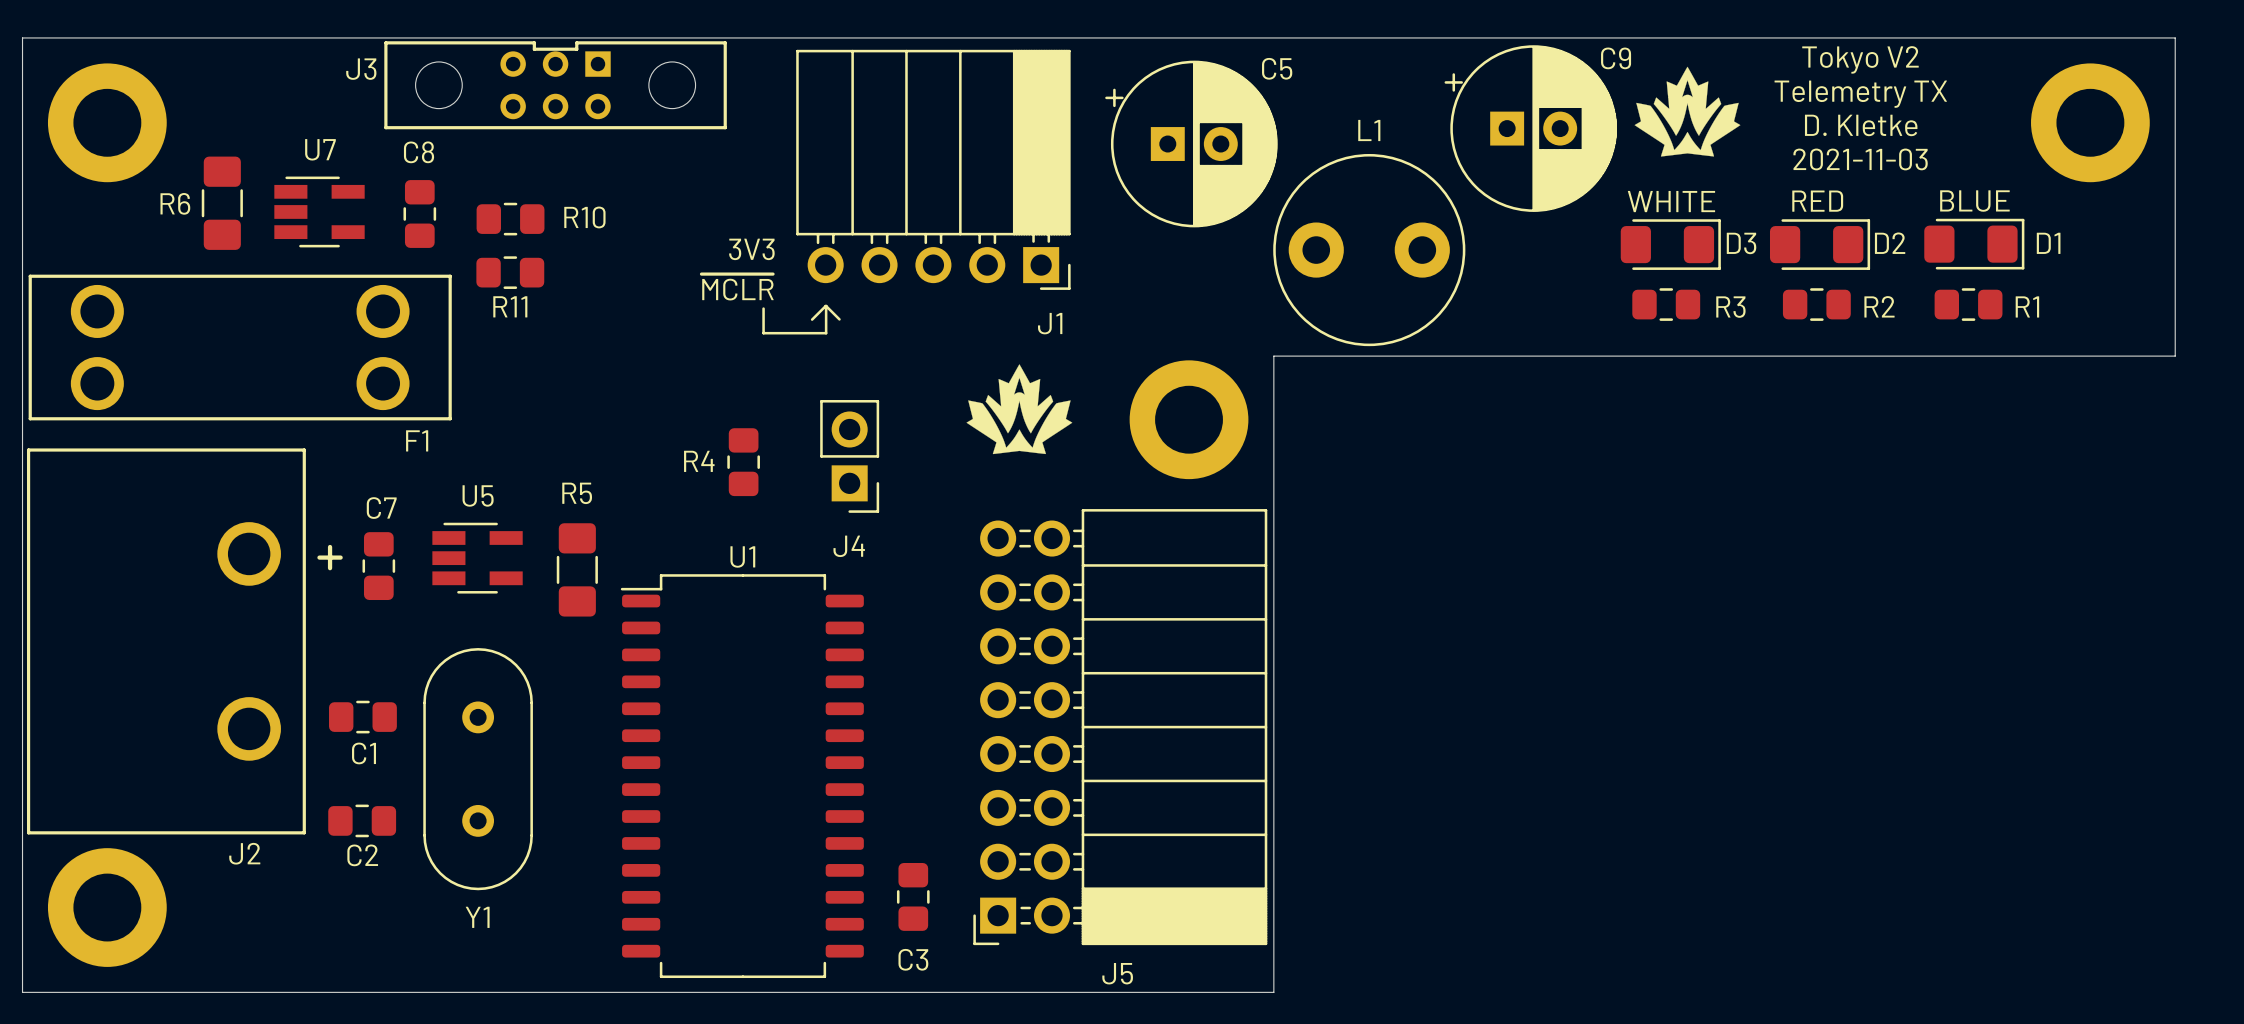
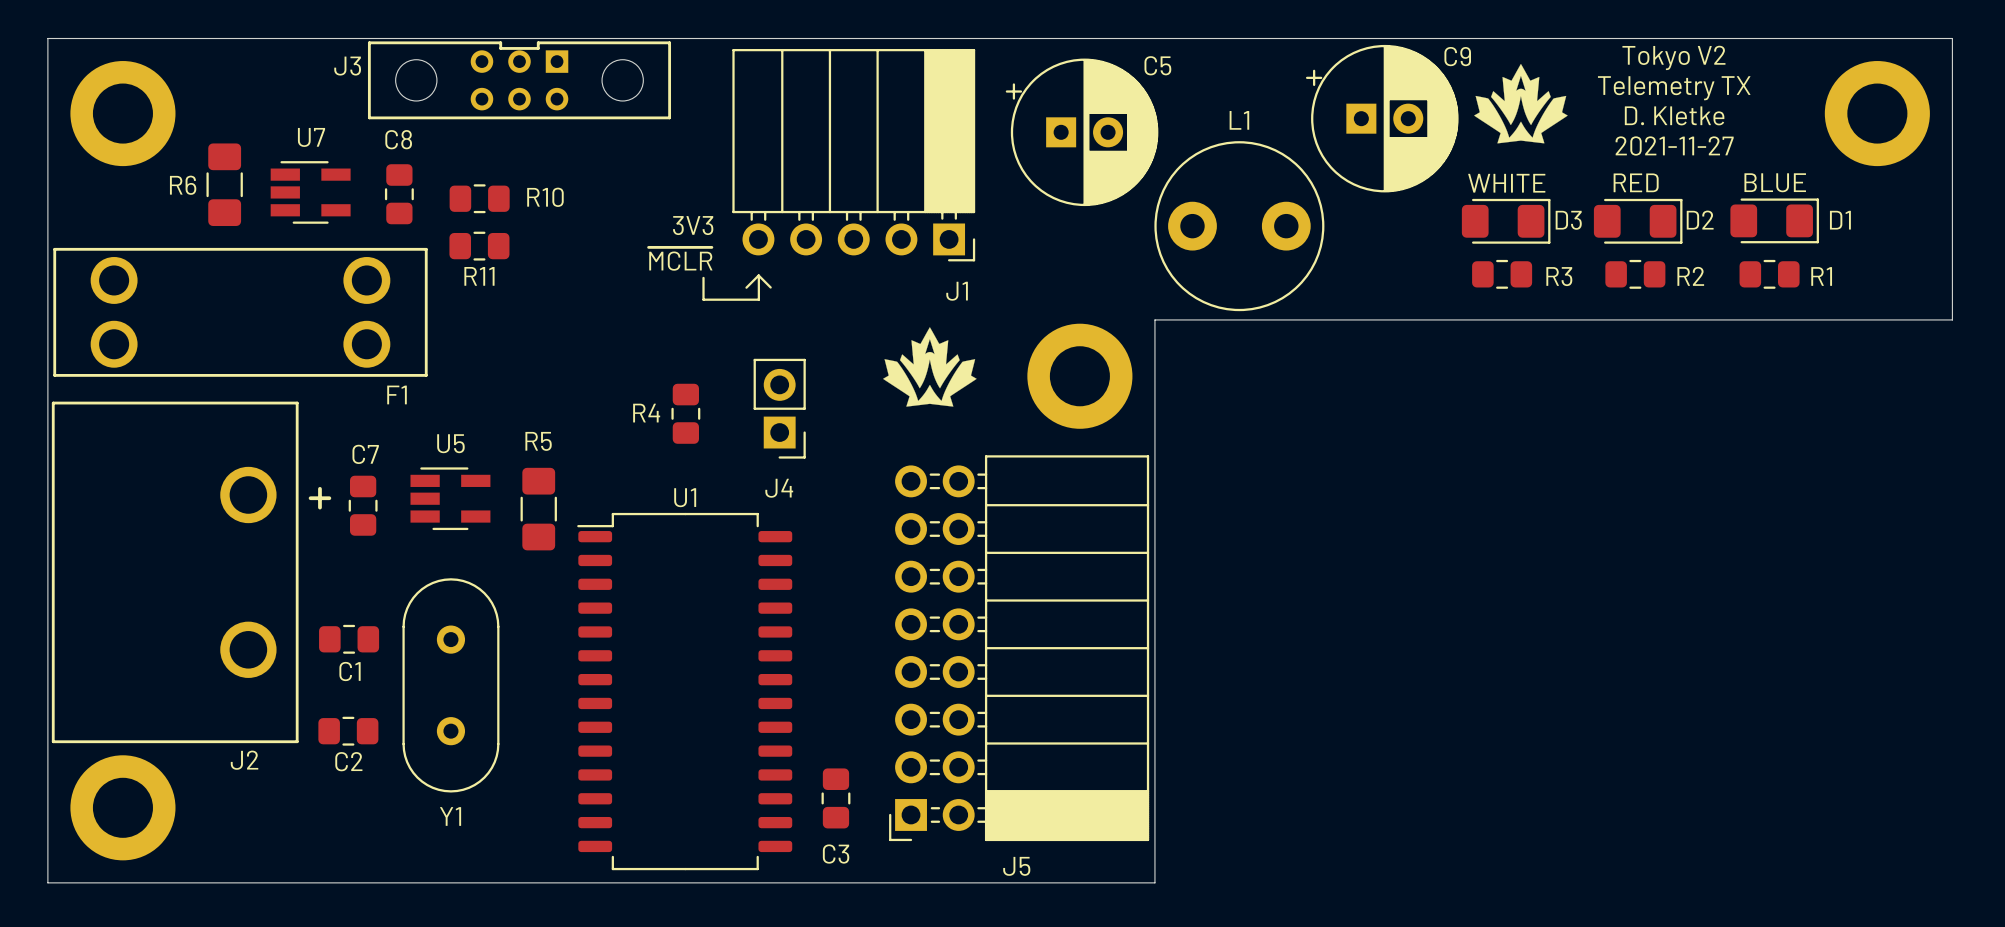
text: 2021-11-03 (1860, 159) -> 2021-11-27 (1674, 145)

